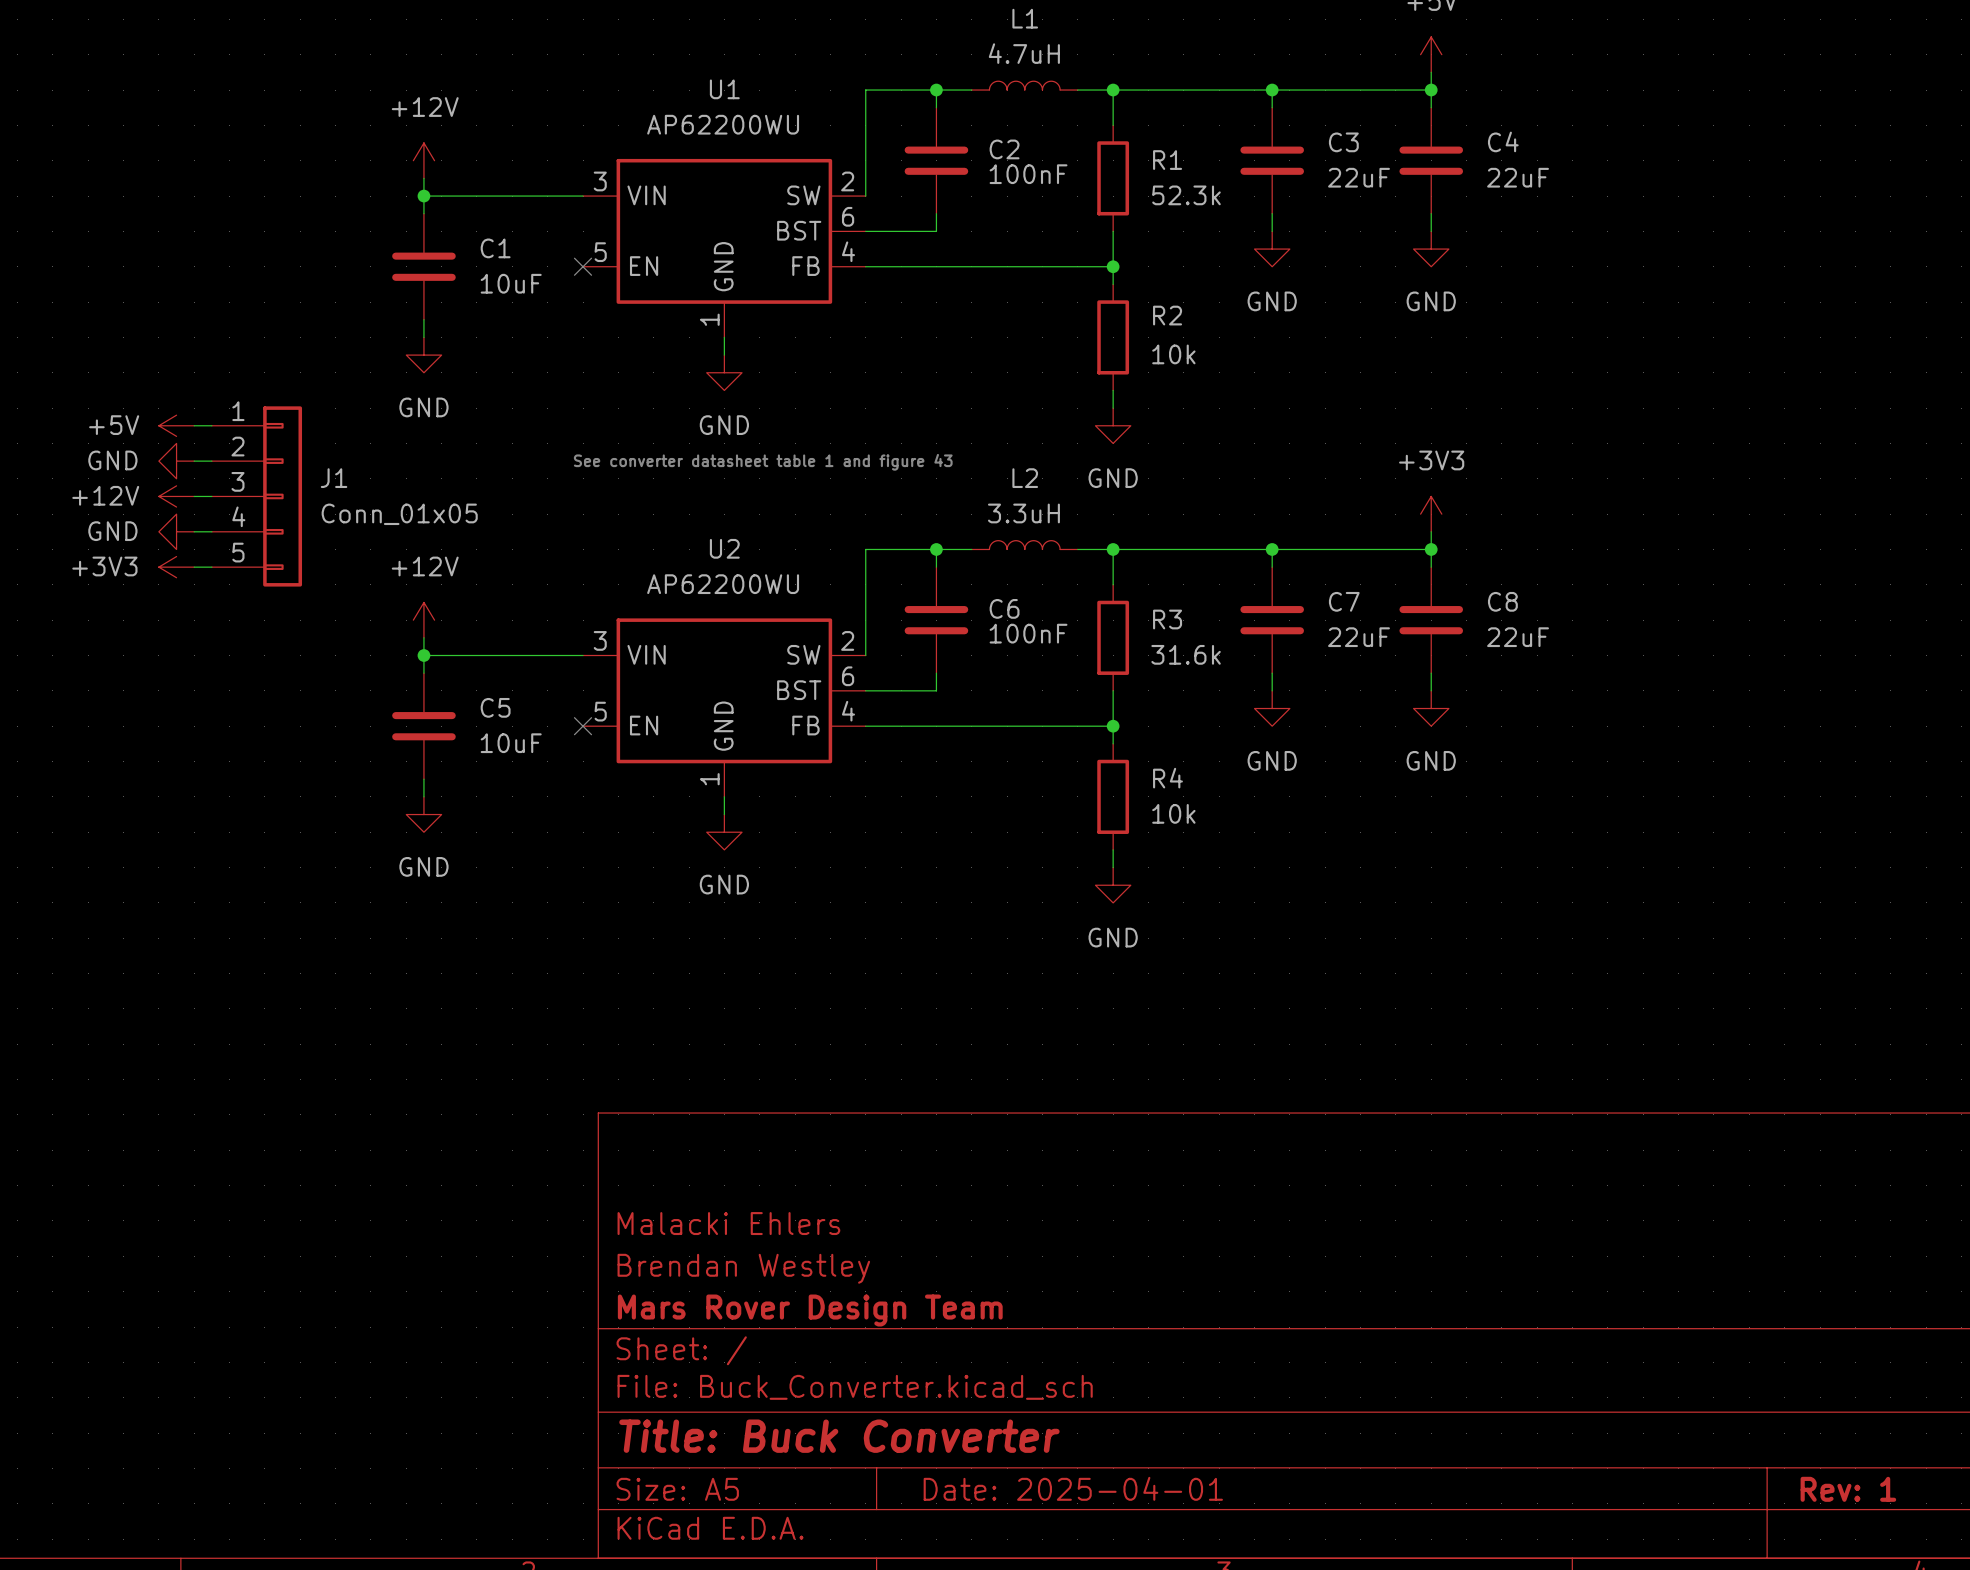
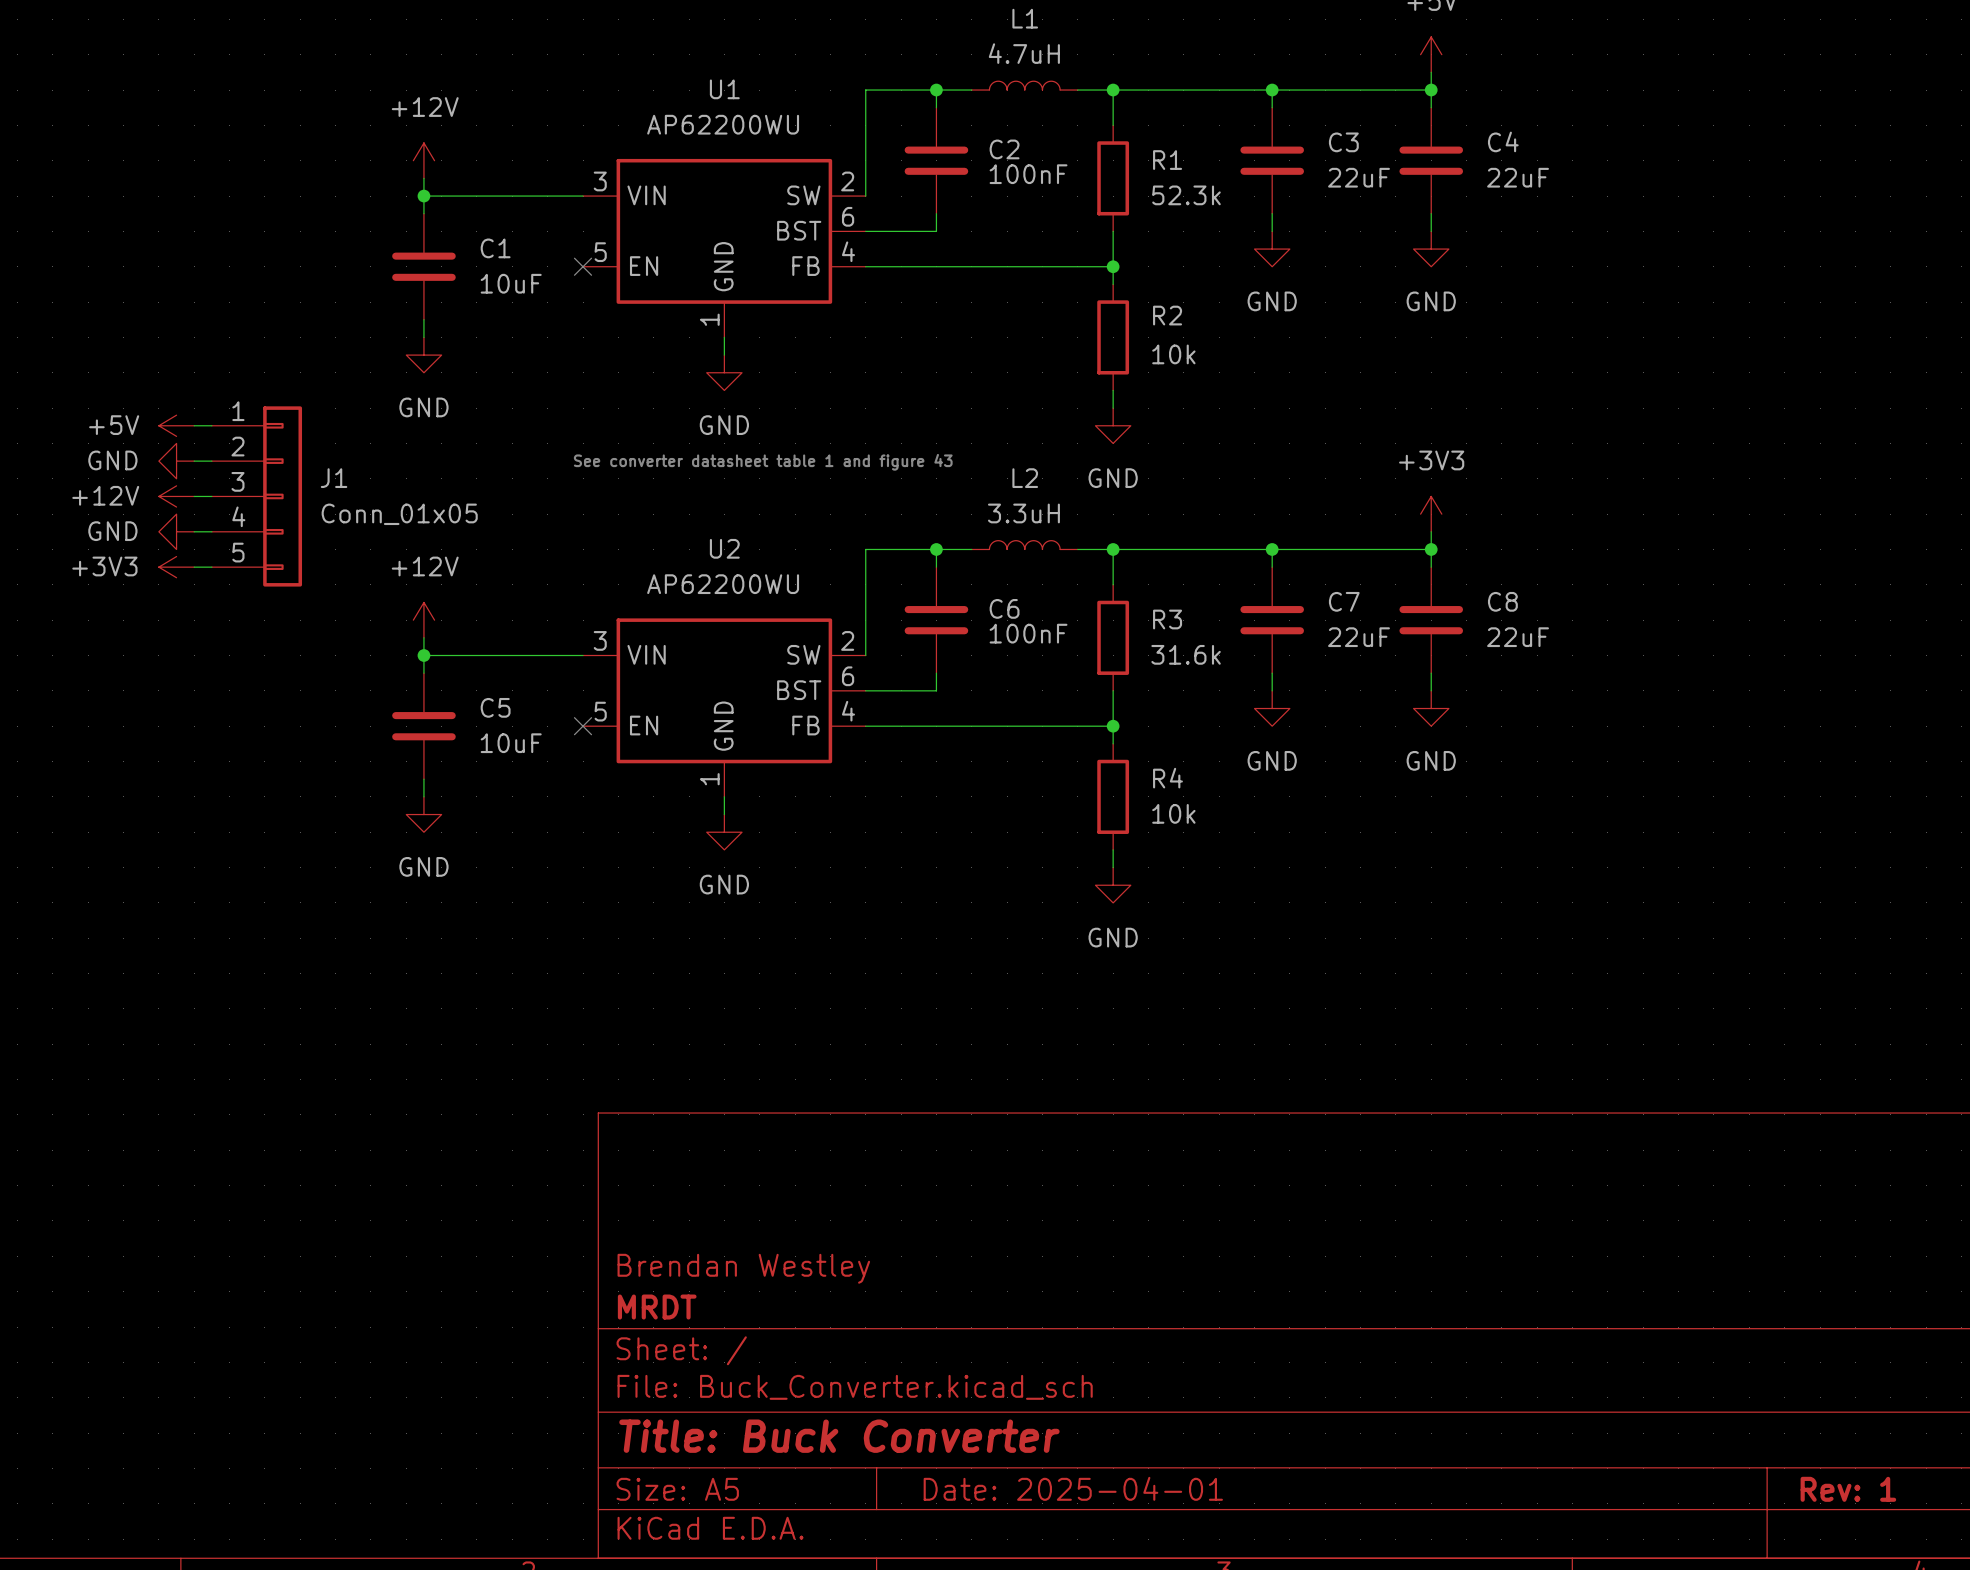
title block: Malacki Ehlers (728, 1223) -> none
title block: Mars Rover Design Team (810, 1310) -> MRDT (657, 1307)

